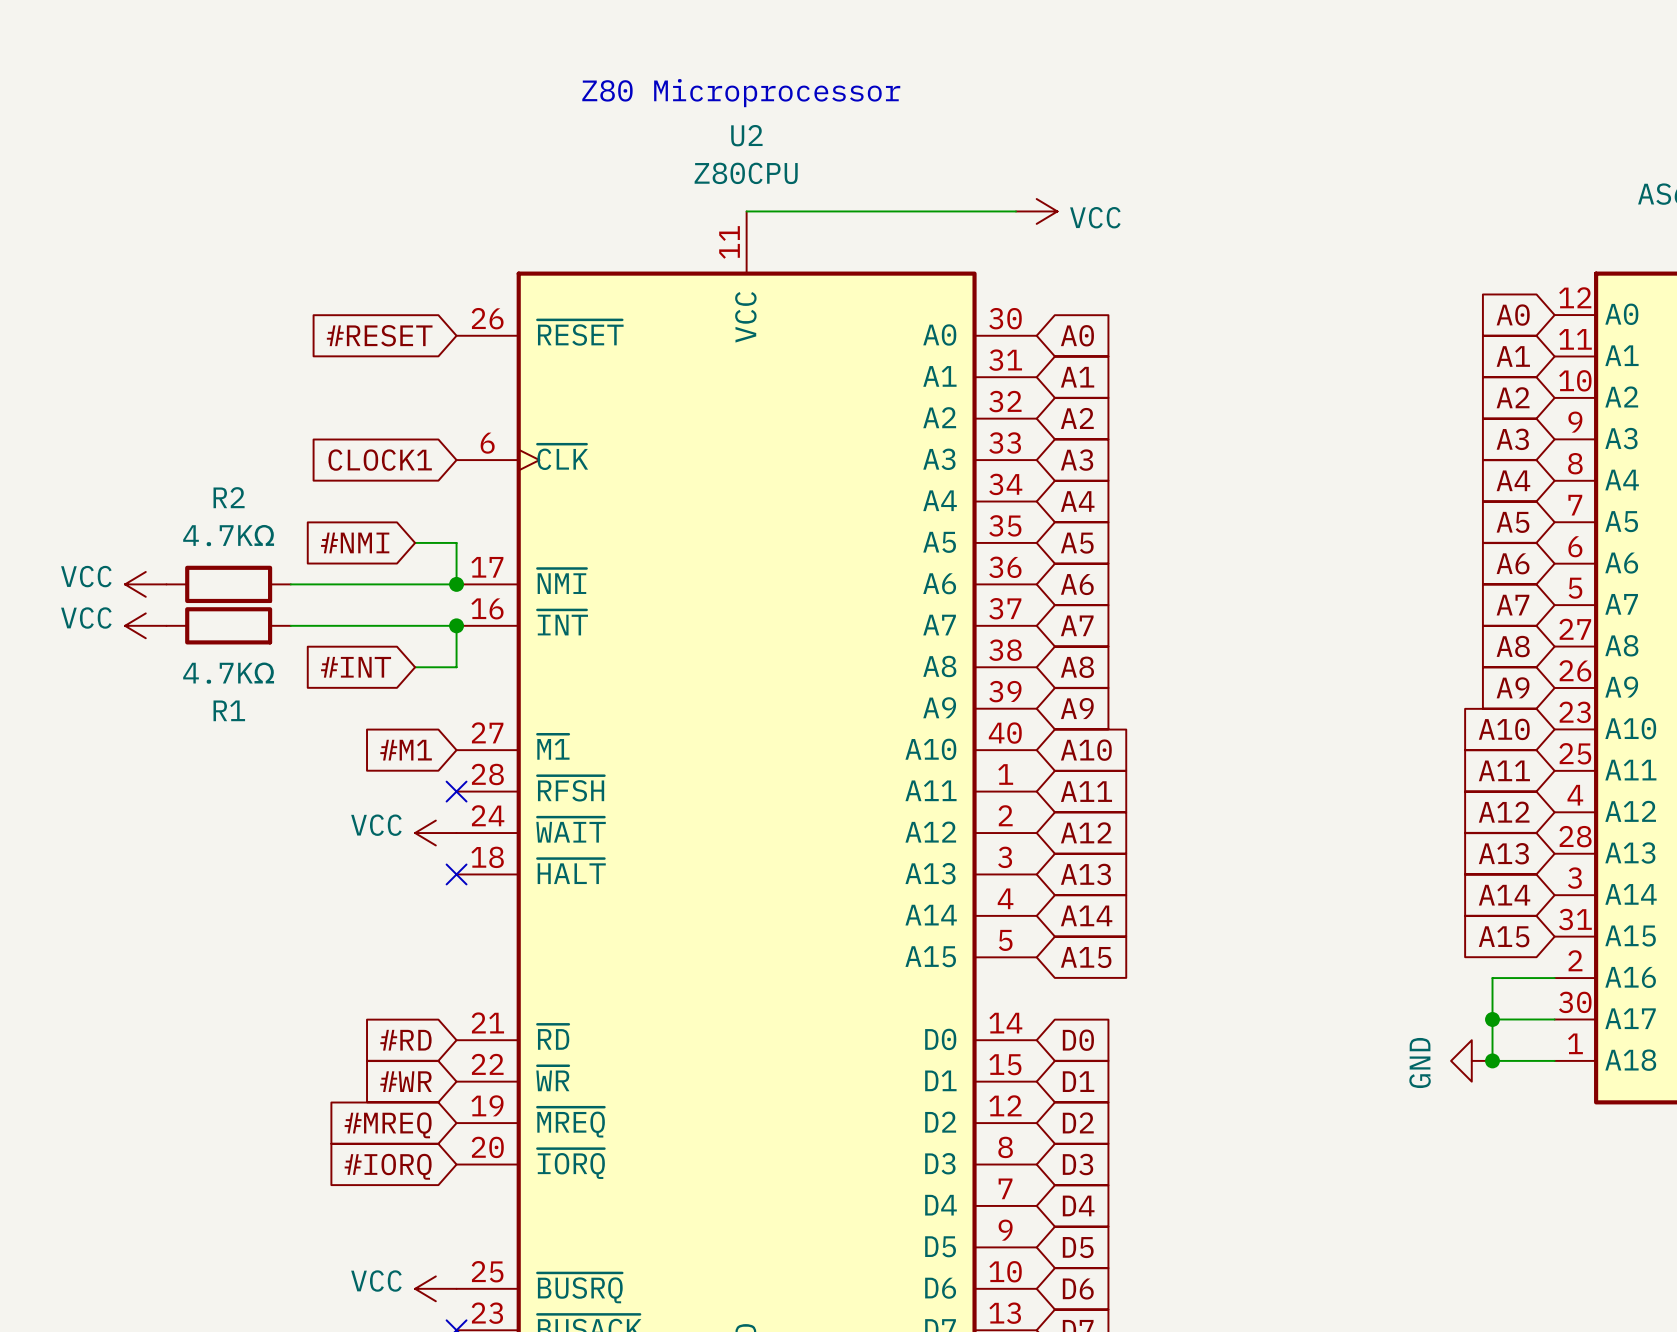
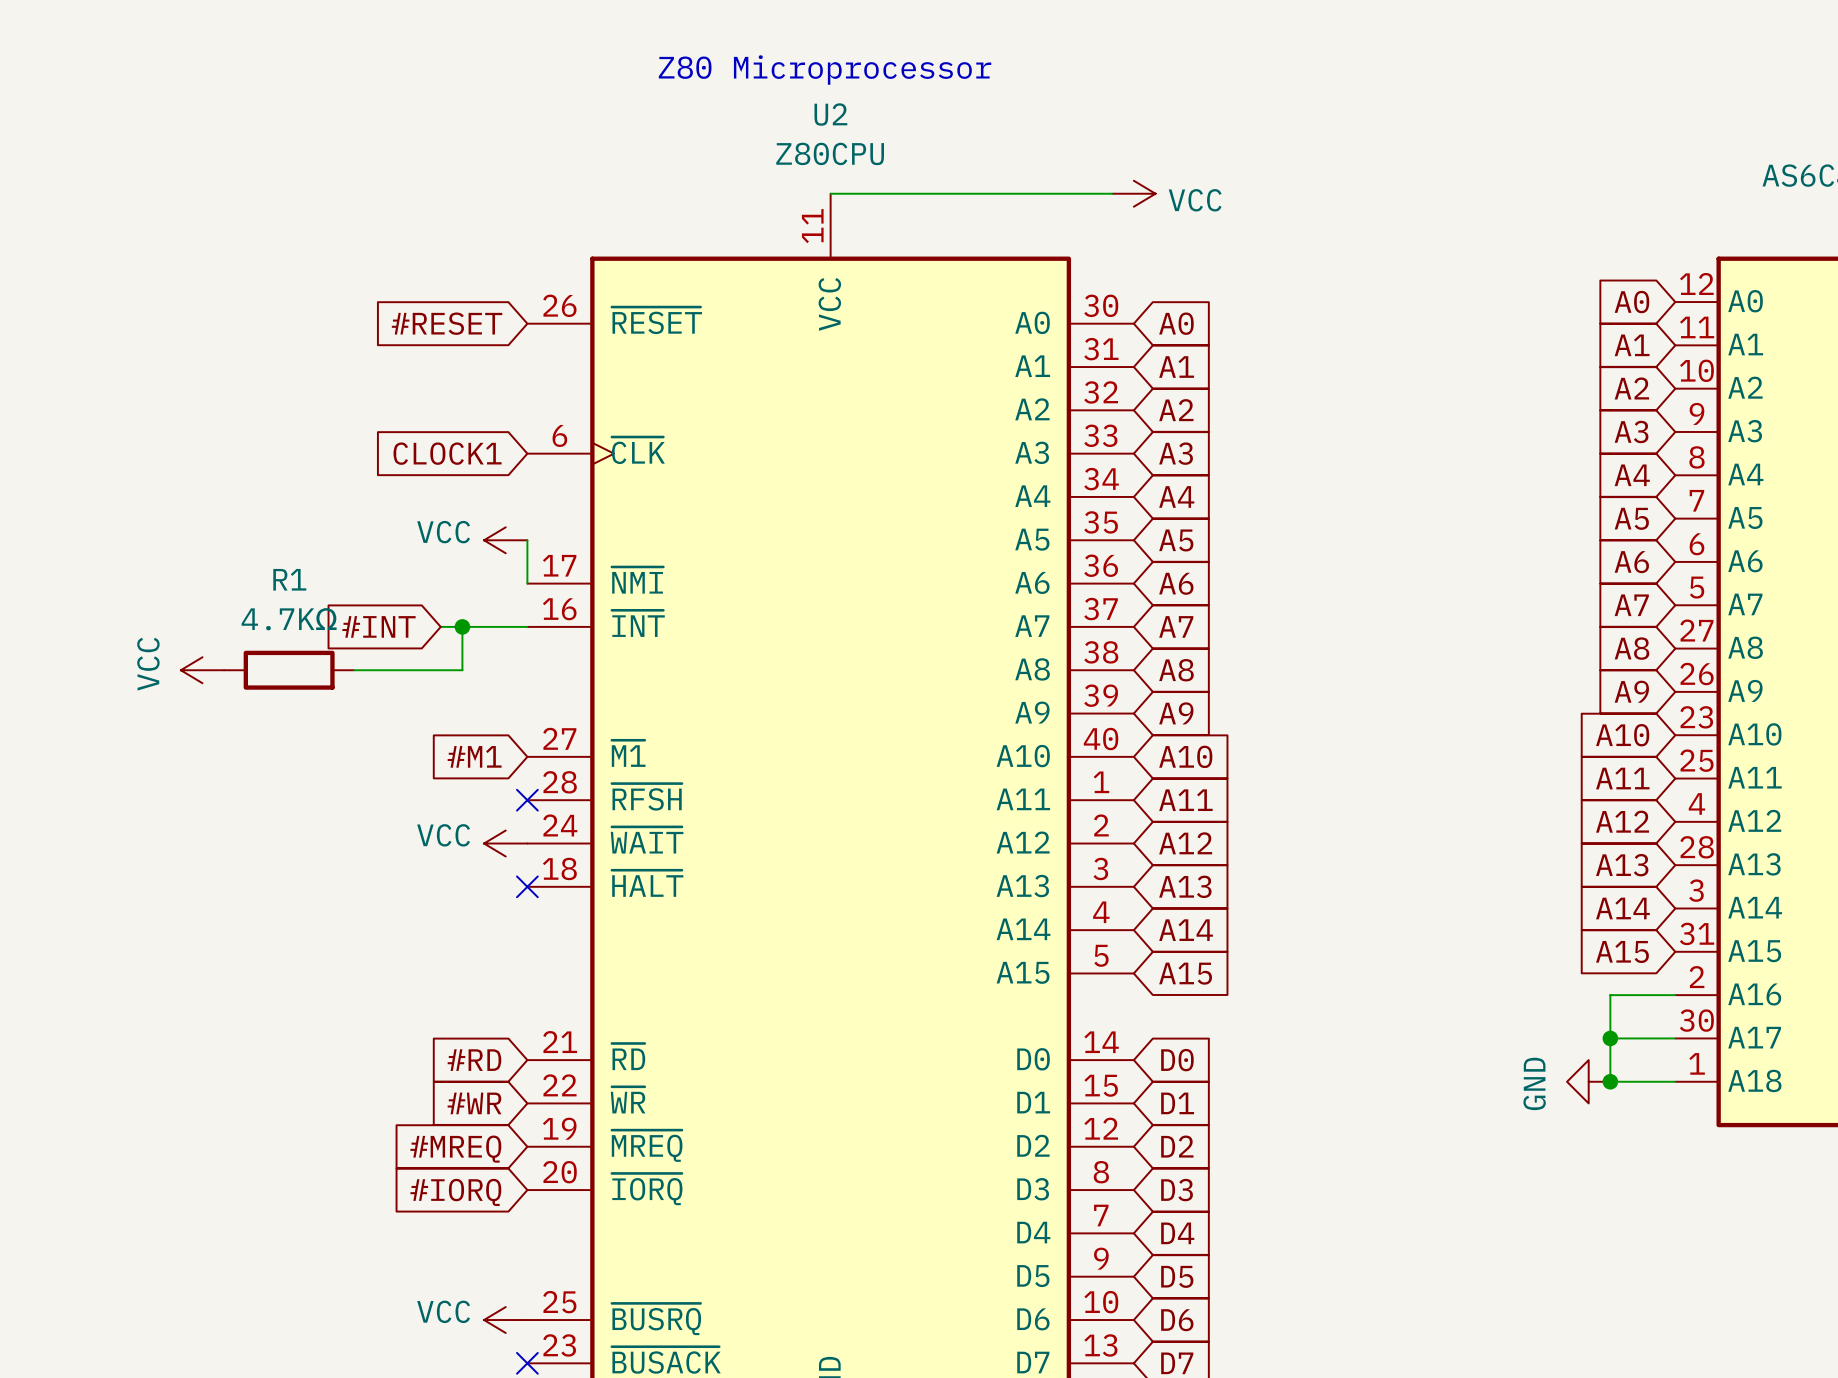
global label: #NMI (355, 542) -> none
power symbol: none -> VCC (505, 540)
power symbol: VCC (145, 584) -> none
R2: 4.7KΩ (228, 584) -> none
wire: (290, 584) (456, 584) -> none
junction: (456, 584) -> none
power symbol: VCC (145, 625) -> none
R1 position: (228, 625) -> (289, 670)
wire: (290, 625) (373, 625) -> none
wire: none -> (462, 626) (462, 670) (354, 670)
junction: none -> (462, 626)
wire: (456, 625) (456, 667) (415, 667) -> none
junction: (456, 625) -> none
power symbol: none -> VCC (202, 670)
global label position: #INT (356, 667) -> #INT (379, 626)
R1 value position: 4.7KΩ (228, 673) -> 4.7KΩ (289, 619)
R1 name position: R1 (229, 710) -> R1 (289, 579)

